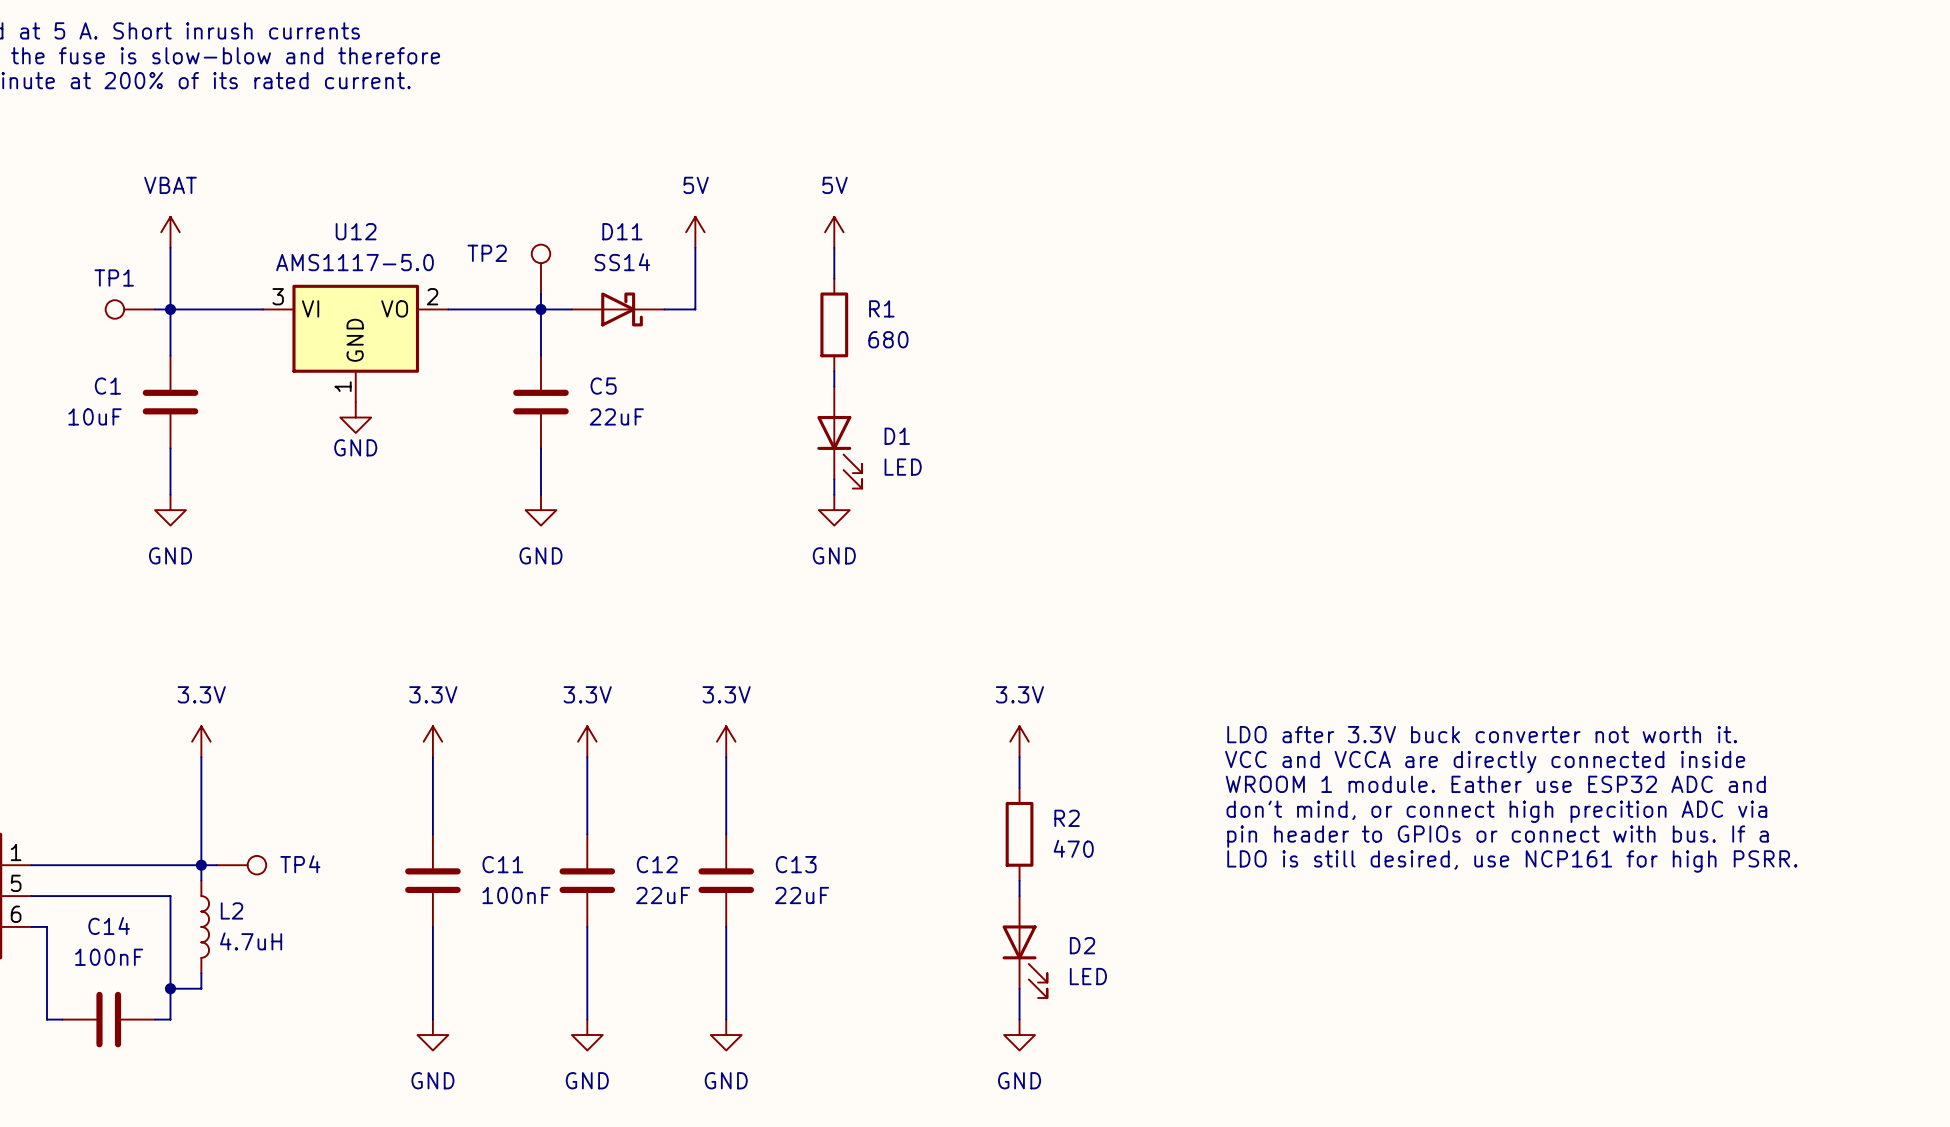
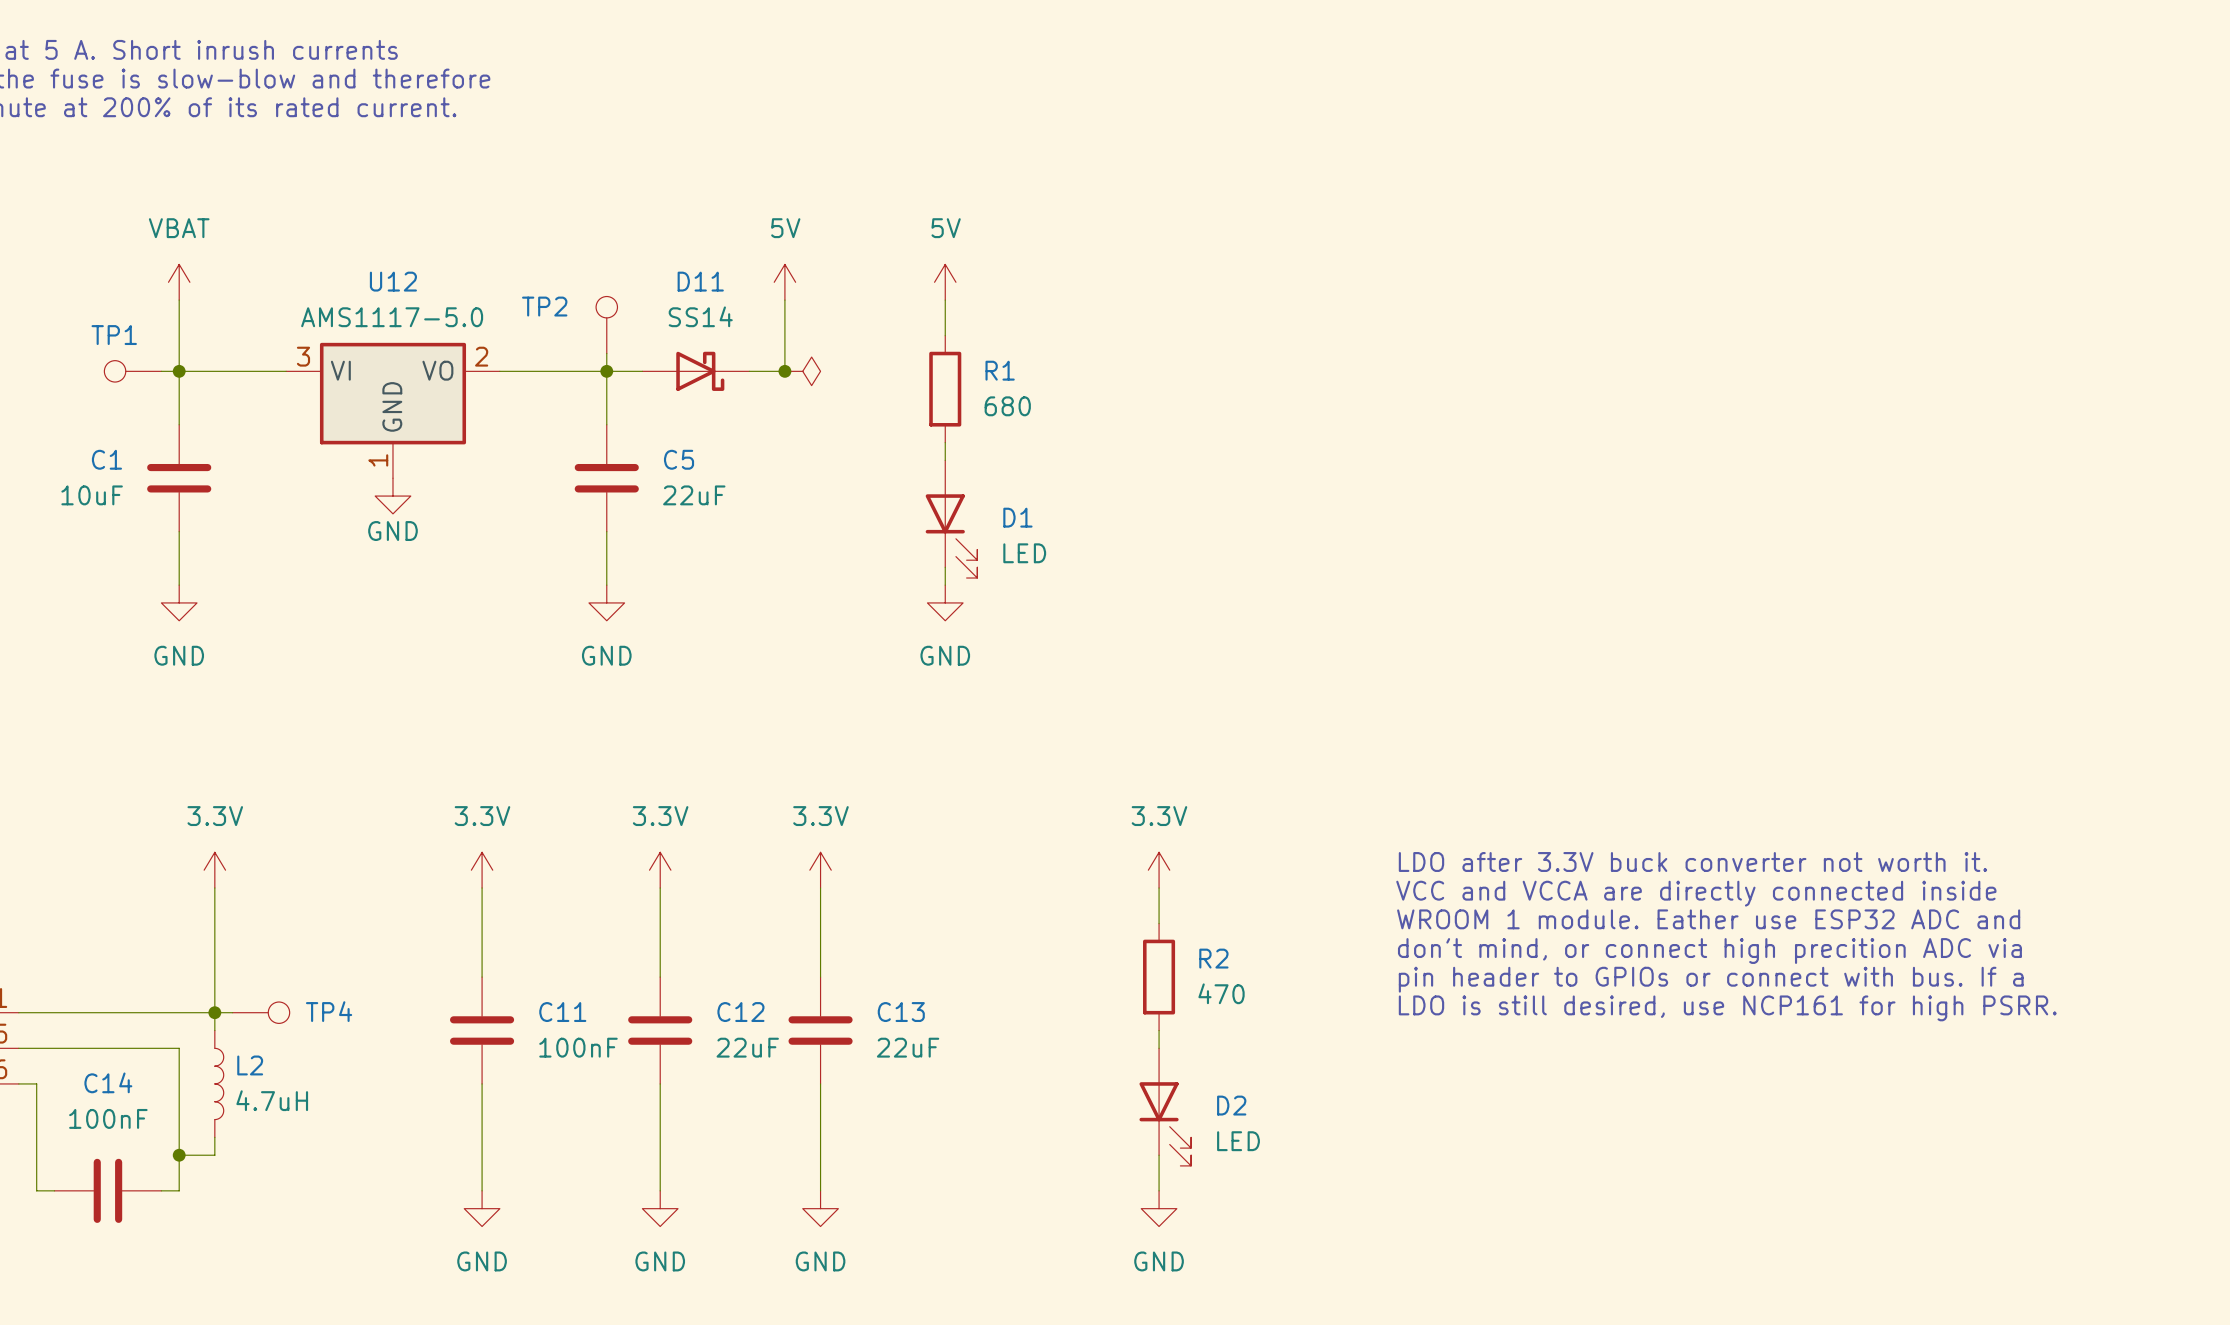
junction: none -> (784, 371)
power symbol: none -> (802, 371)

